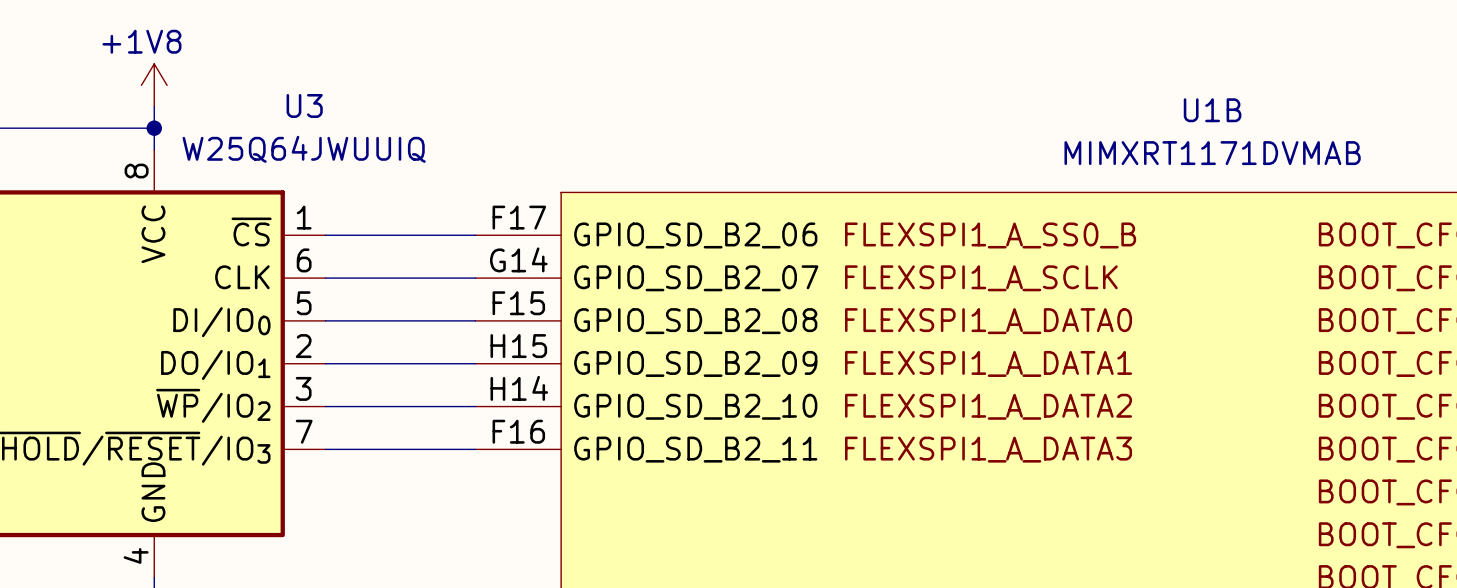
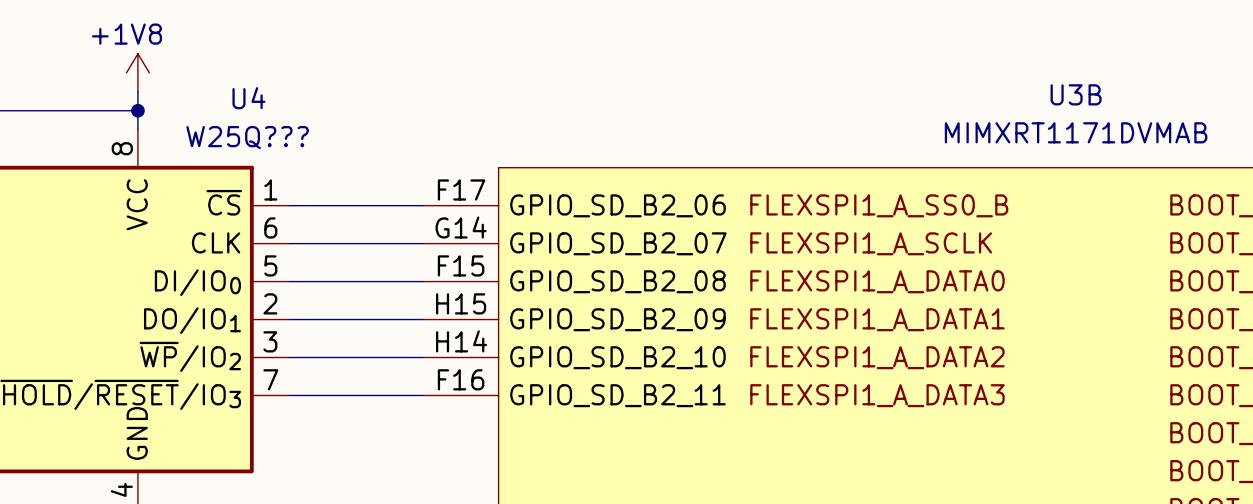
U3 name: U3 (304, 105) -> U4 (248, 98)
U1B name: U1B (1212, 110) -> U3B (1076, 94)
U3 value: W25Q64JWUUIQ (304, 149) -> W25Q??? (247, 137)

